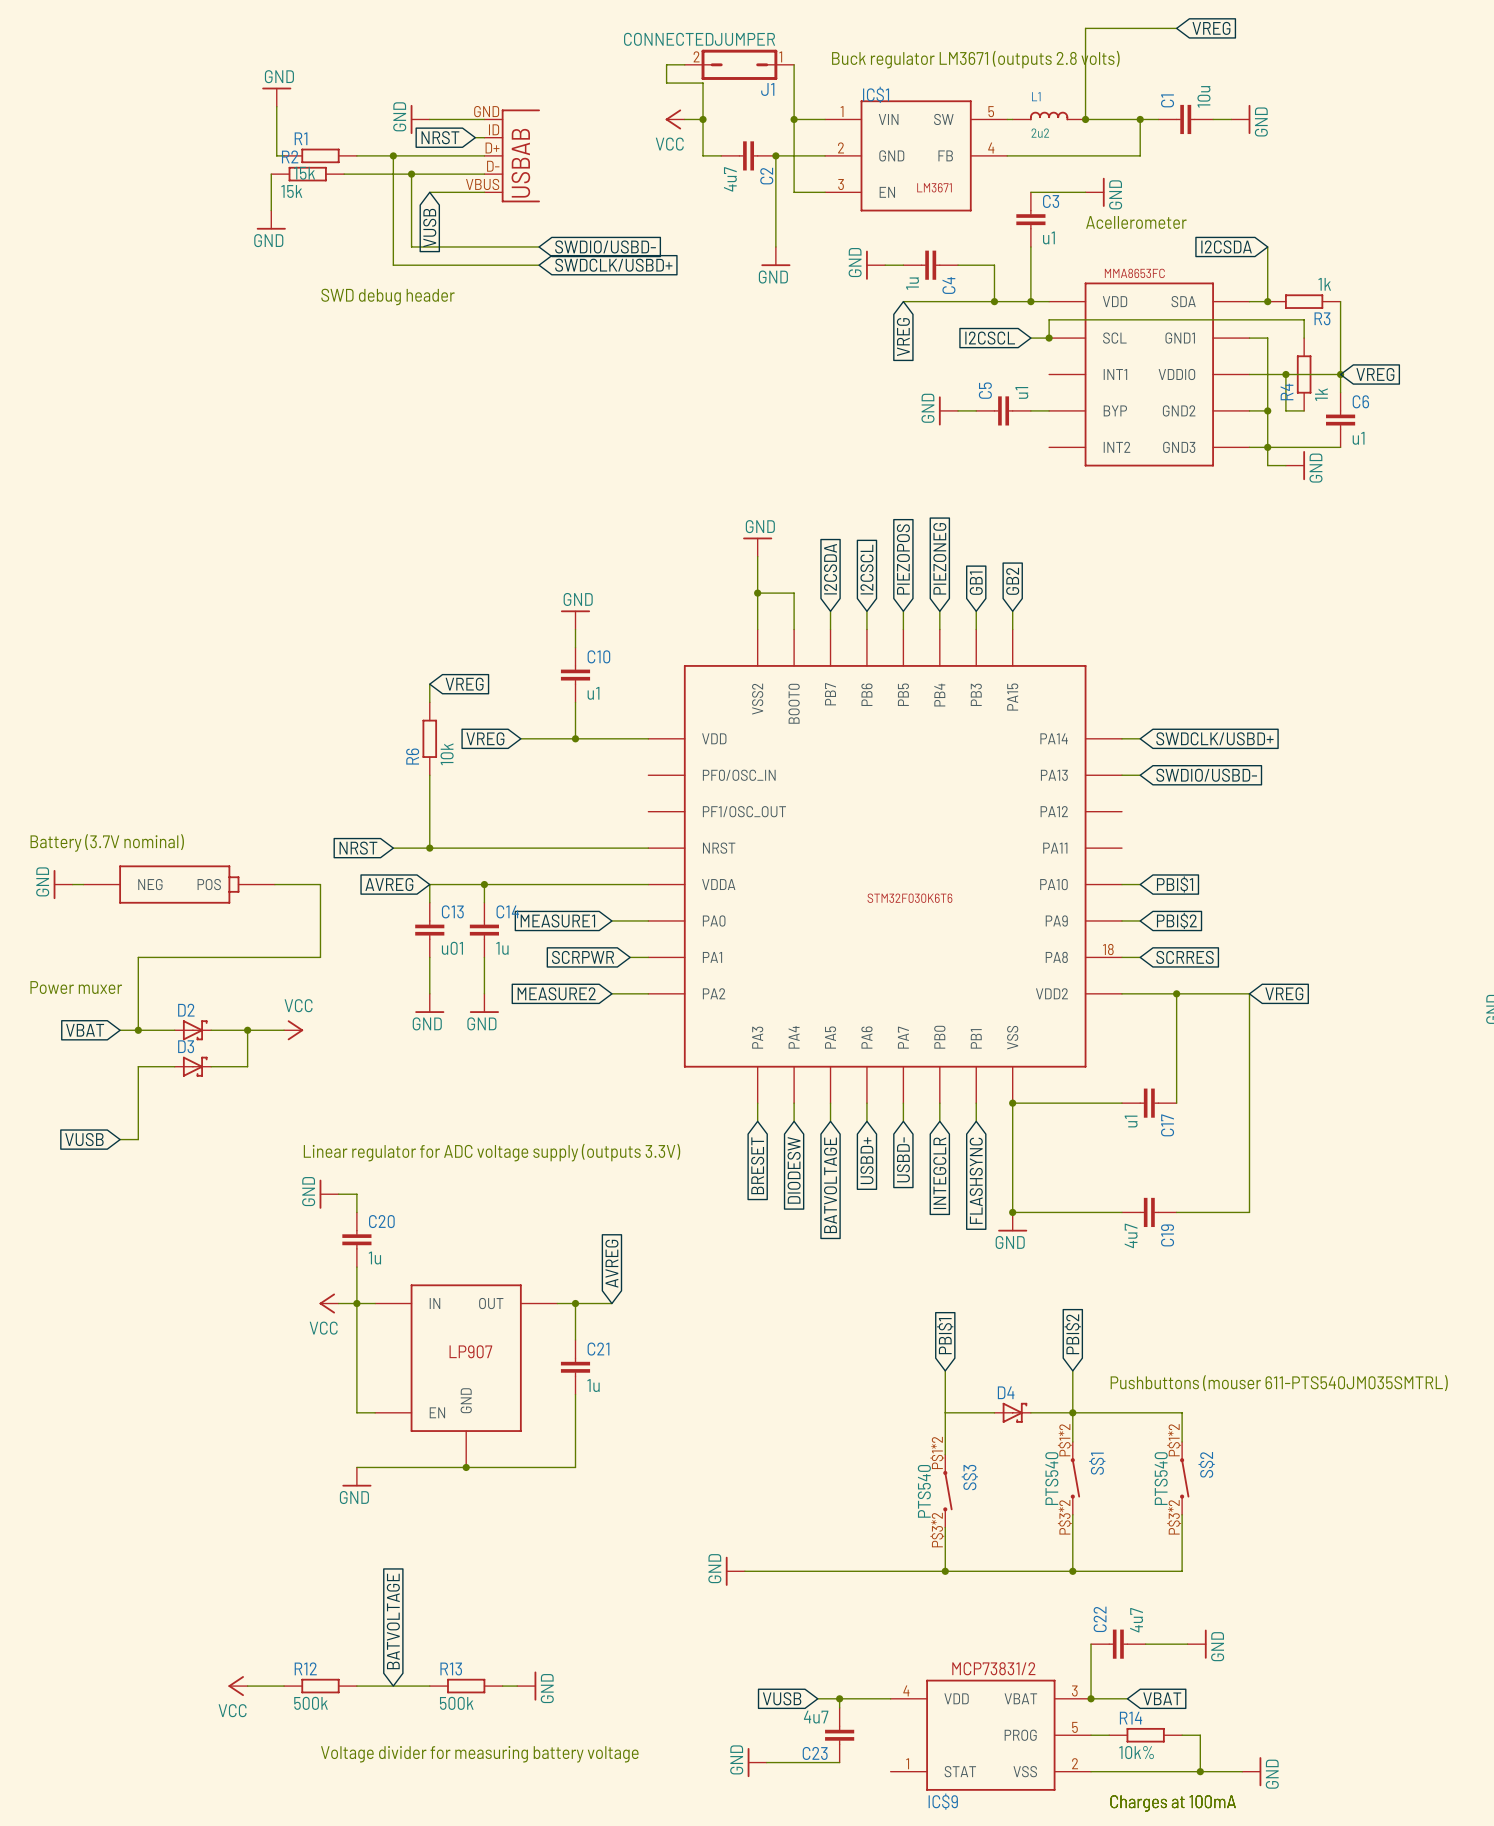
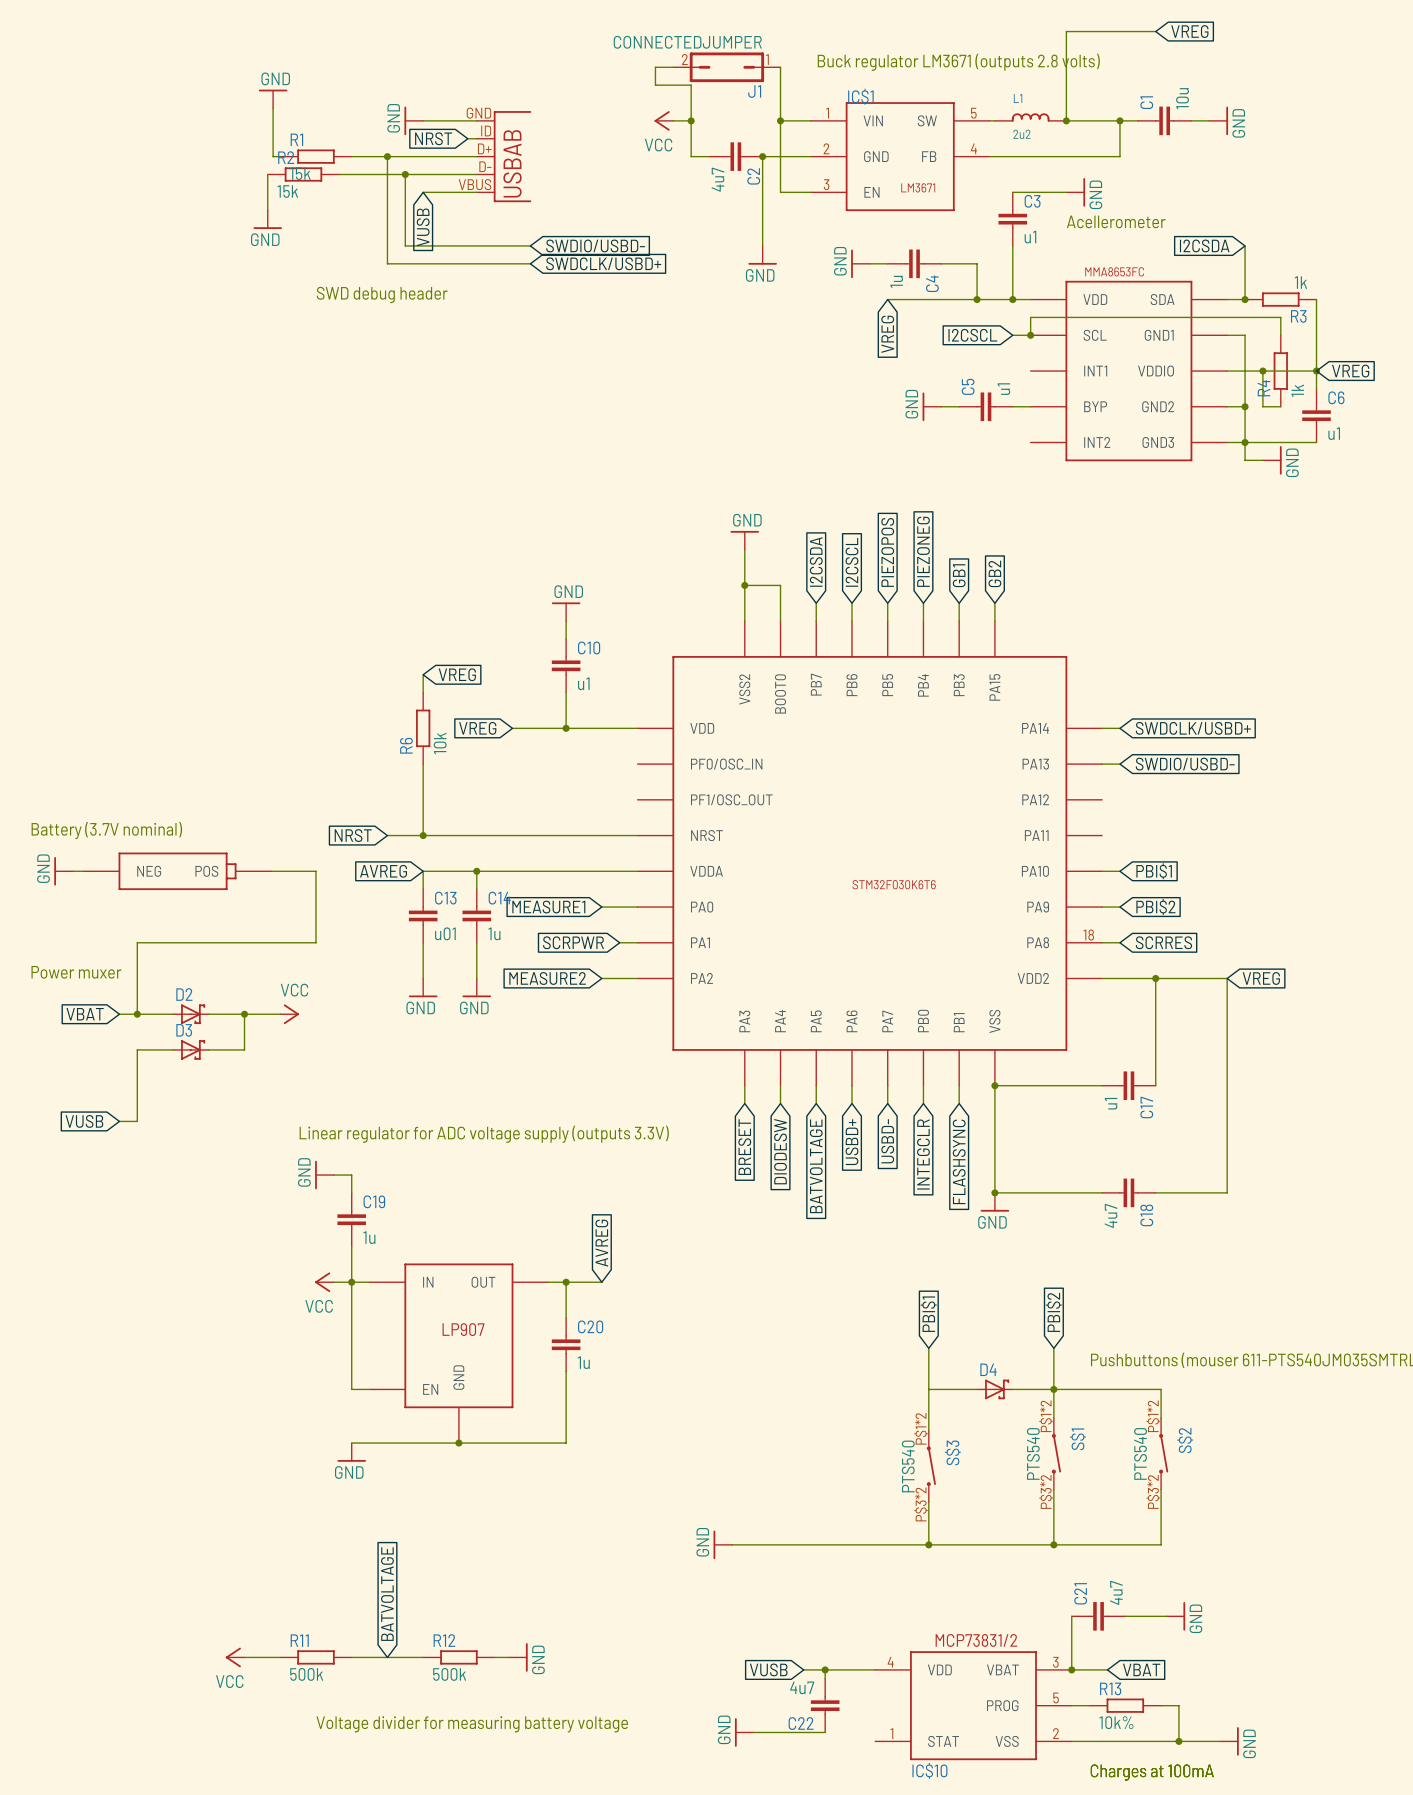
C20 name: C20 (381, 1221) -> C19 (374, 1201)
C19 name: C19 (1167, 1235) -> C18 (1146, 1215)
C21 name: C21 (598, 1349) -> C20 (590, 1326)
C22 name: C22 (1100, 1619) -> C21 (1080, 1593)
R12 name: R12 (305, 1668) -> R11 (299, 1640)
R13 name: R13 (451, 1669) -> R12 (444, 1640)
R14 name: R14 (1131, 1718) -> R13 (1110, 1688)
C23 name: C23 (815, 1753) -> C22 (801, 1723)
IC$9 name: IC$9 (943, 1801) -> IC$10 (929, 1770)

